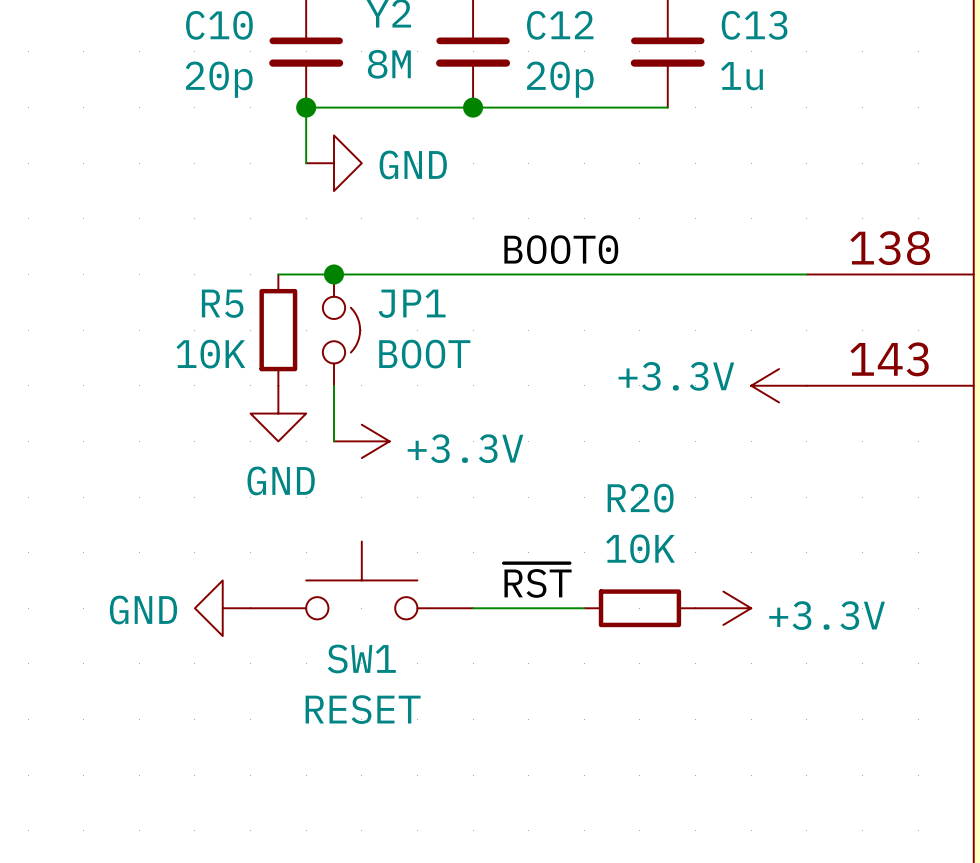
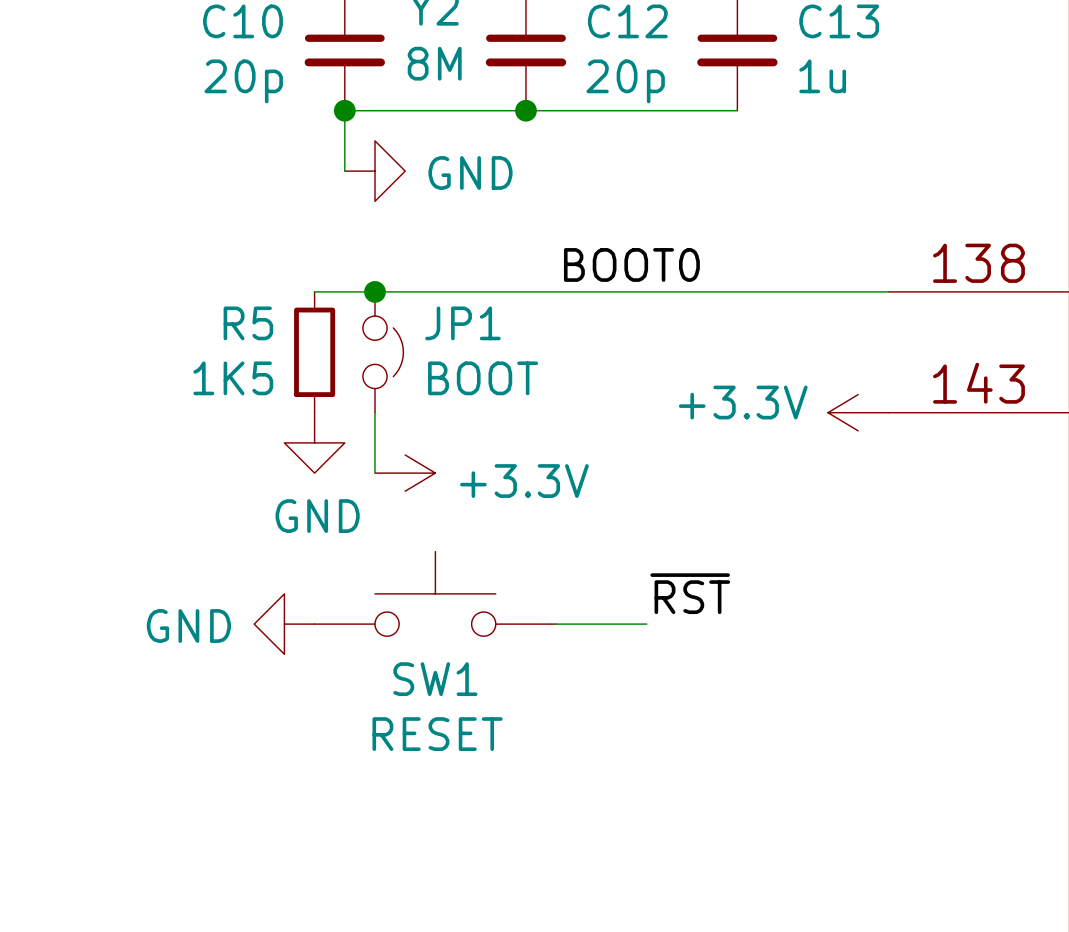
R5 value: 10K (210, 354) -> 1K5 (233, 378)
SW1 position: (361, 580) -> (435, 593)
wire: none -> (556, 624) (646, 624)
label position: ~{RST} (537, 580) -> ~{RST} (690, 593)
power symbol position: GND (222, 608) -> GND (284, 624)
wire: (473, 608) (584, 608) -> none
R20: 10K (639, 608) -> none
power symbol: +3.3V (723, 608) -> none

